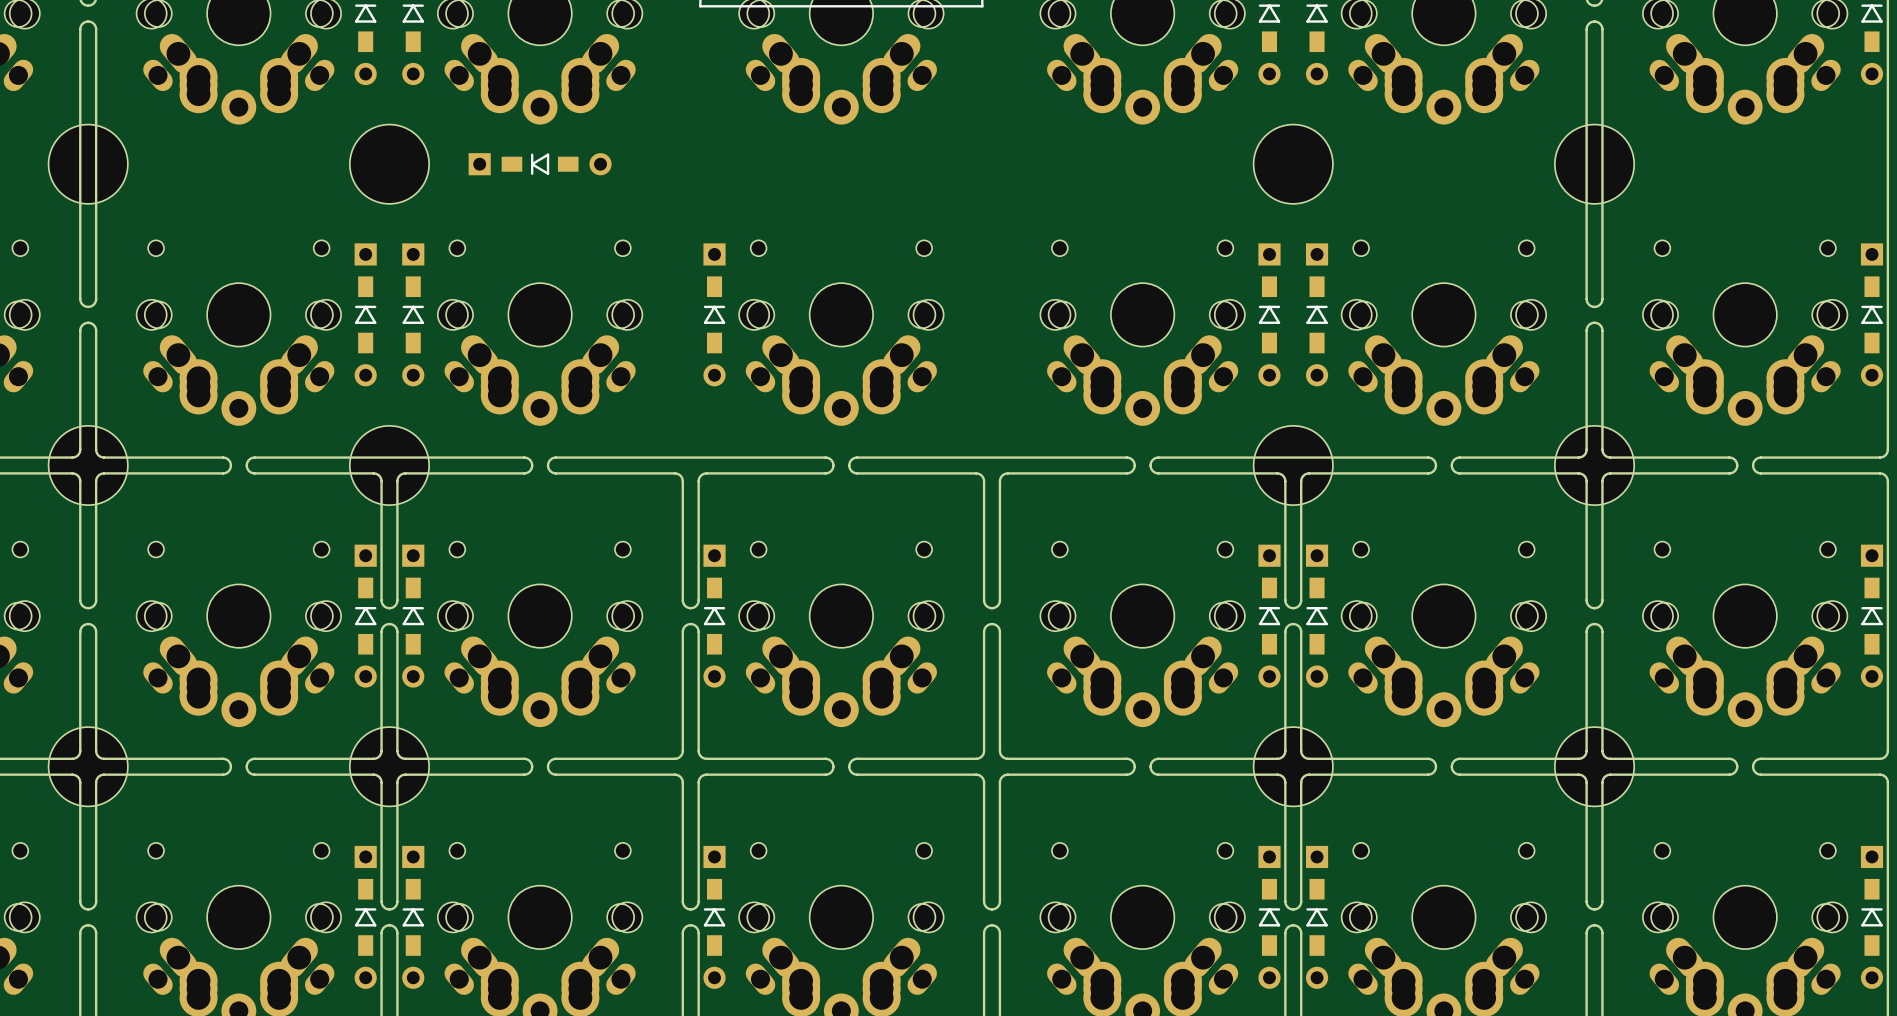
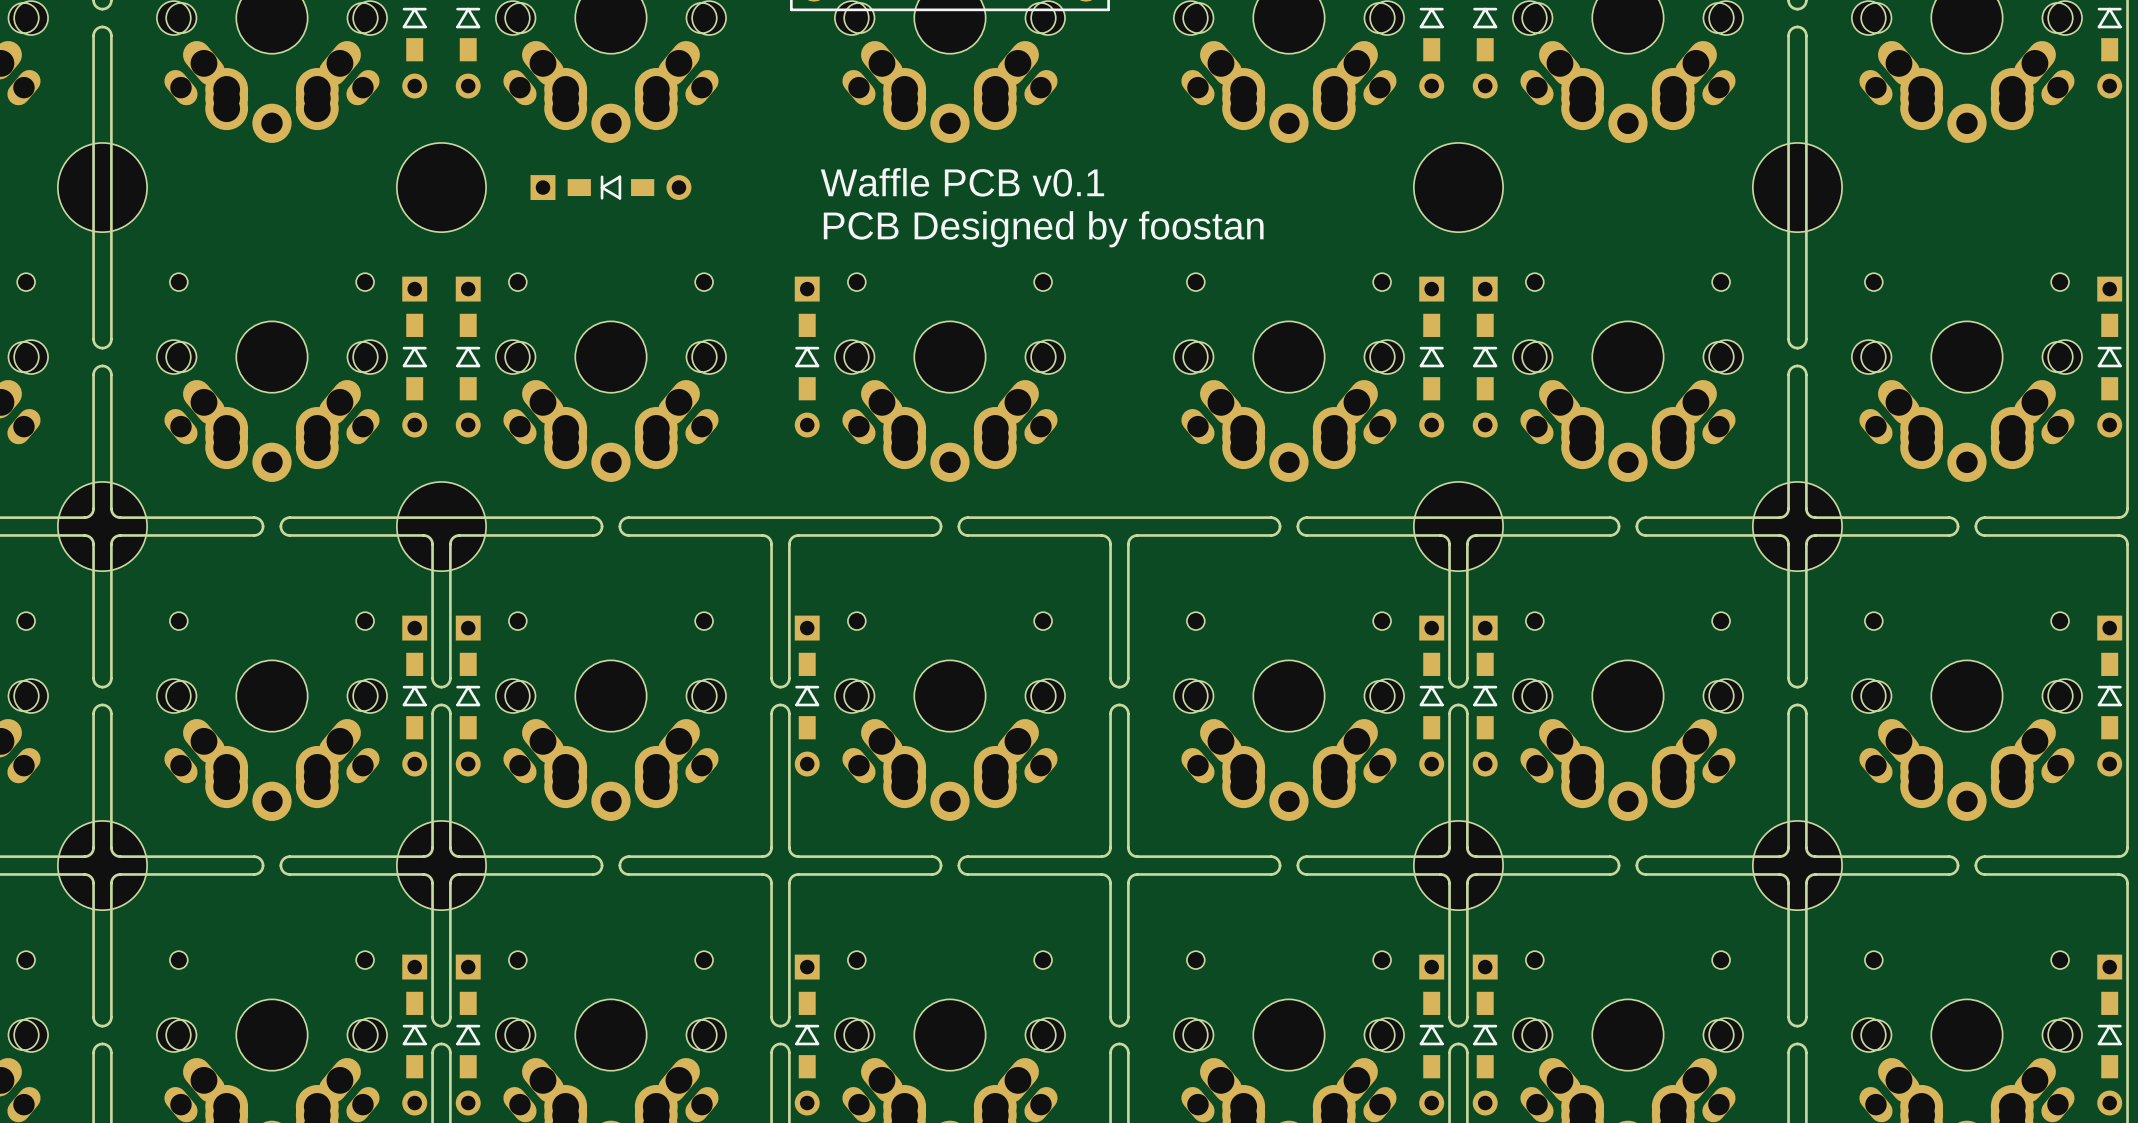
text: none -> Waffle PCB v0.1 (962, 182)
text: none -> PCB Designed by foostan (1043, 229)

